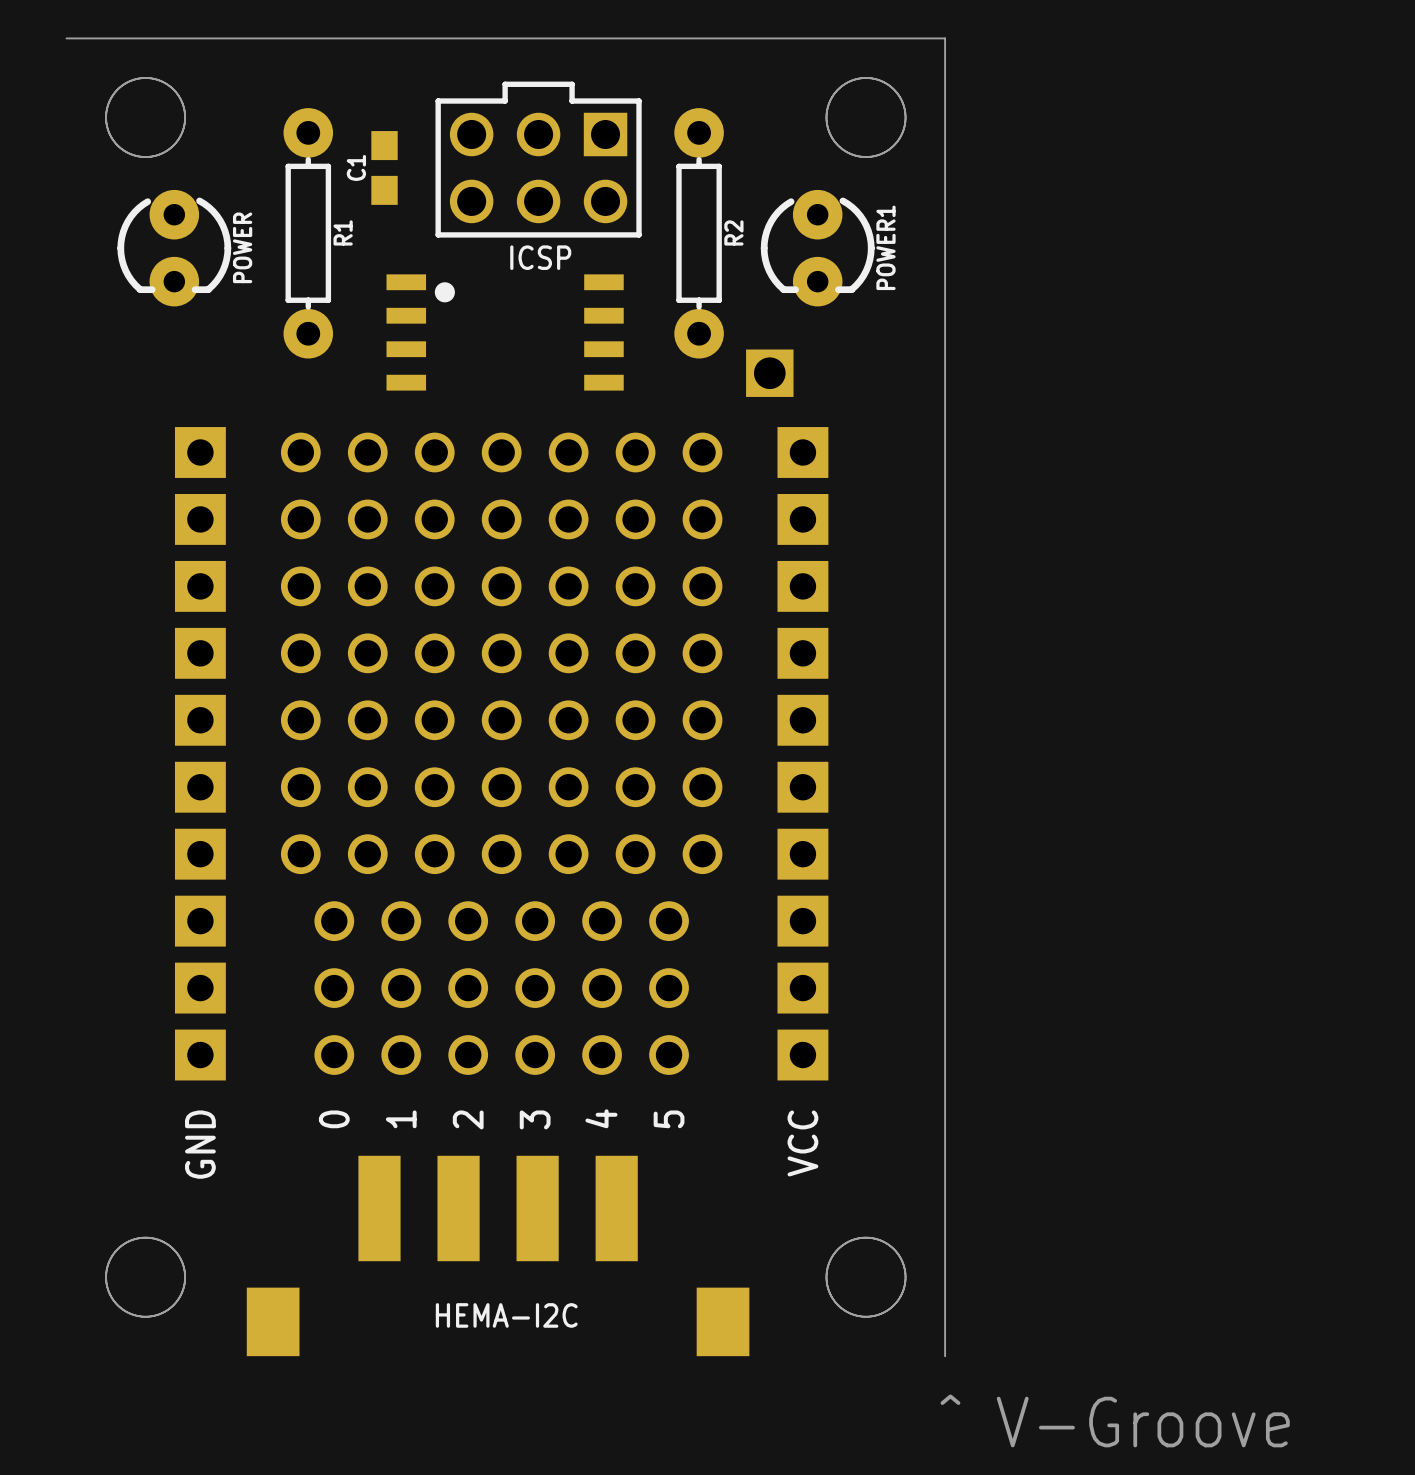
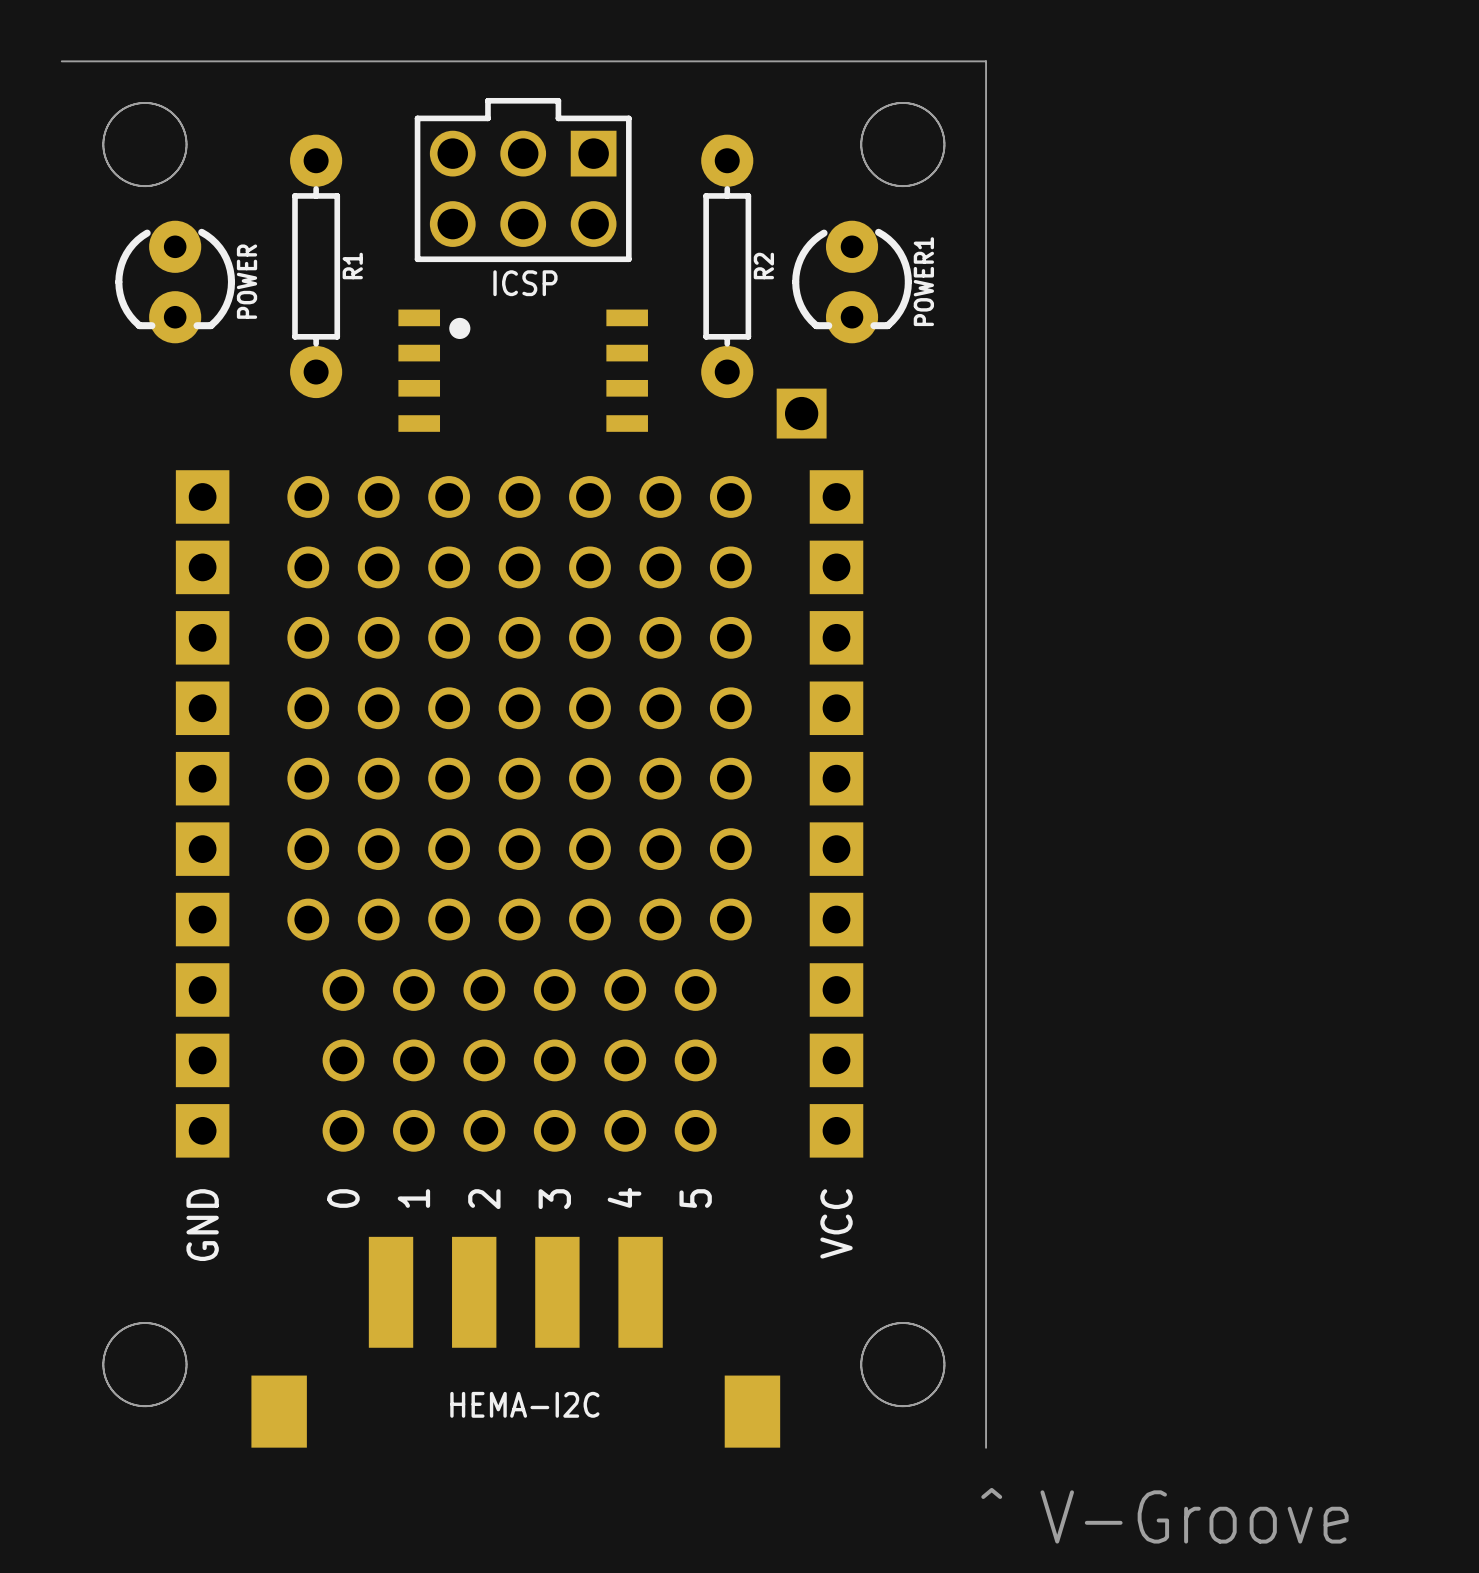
part position: (538, 159) -> (523, 180)
C1: (384, 167) -> none

